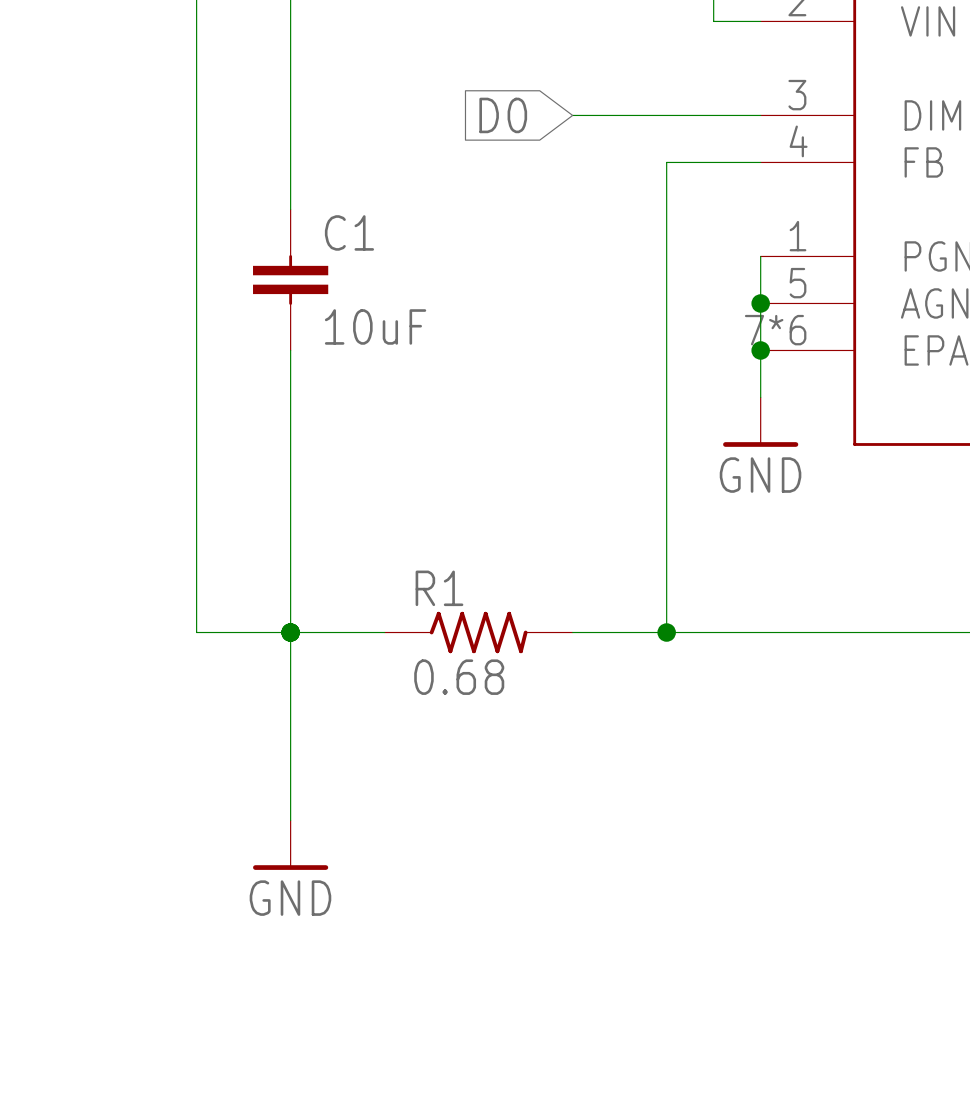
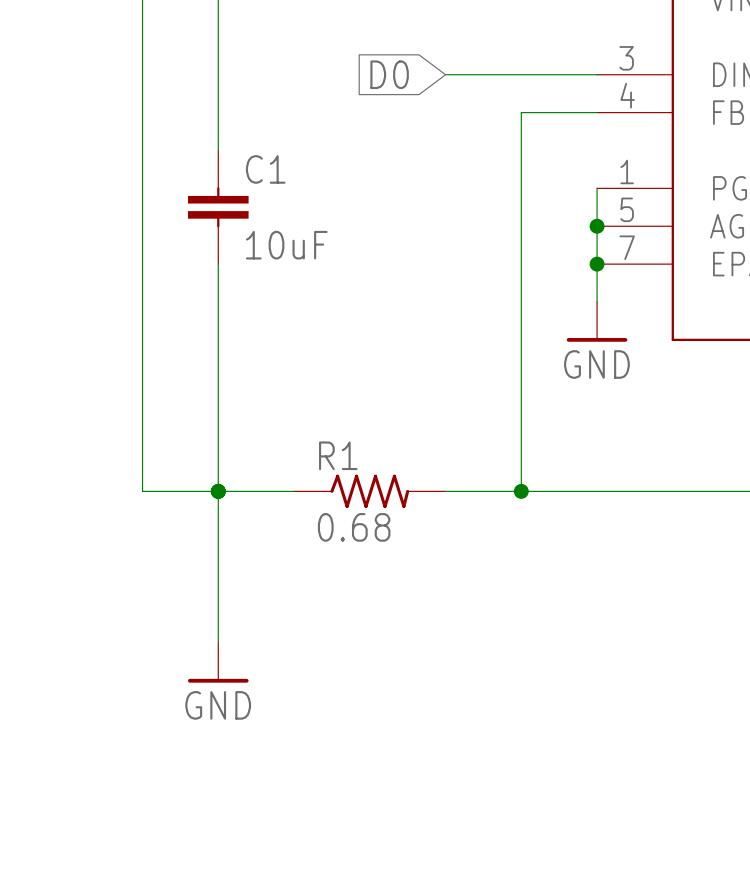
part pin number: 7*6 (775, 330) -> 7 (627, 247)

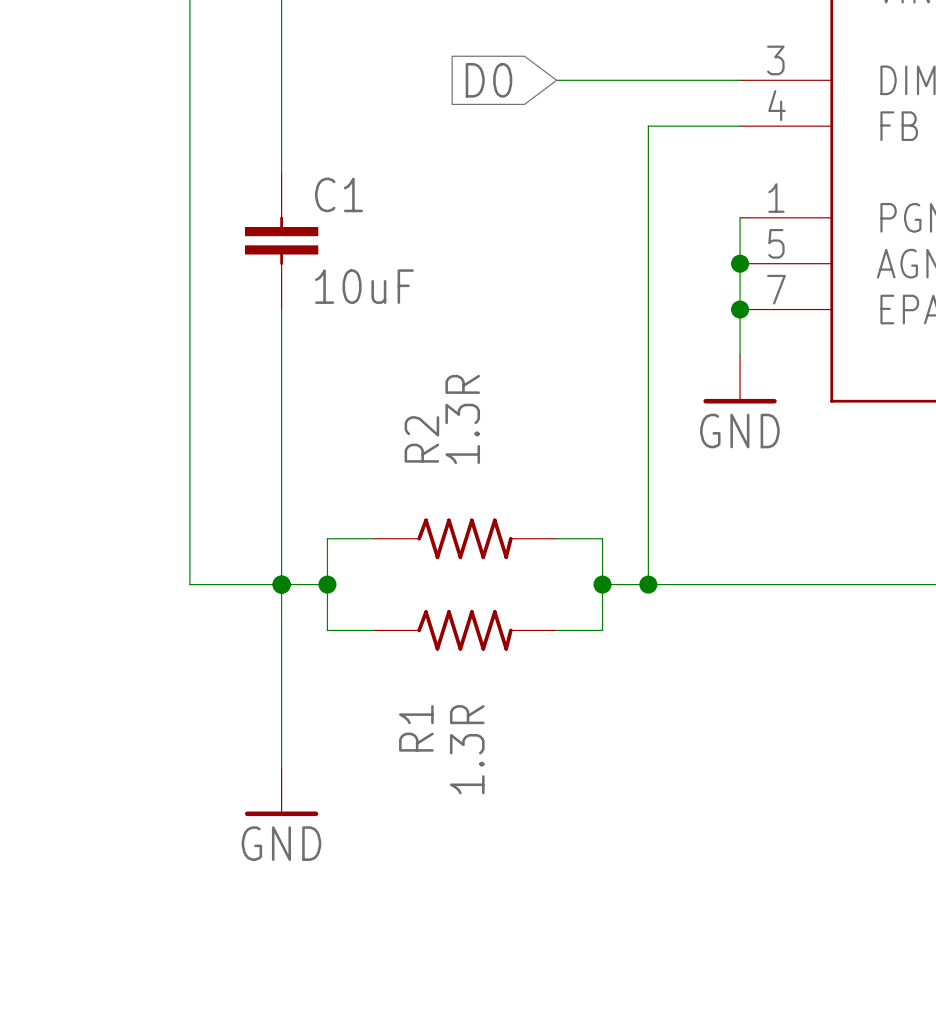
wire: none -> (373, 538) (327, 538) (327, 630) (373, 630)
R2: none -> 1.3R (464, 538)
wire: none -> (556, 538) (602, 538) (602, 630) (556, 630)
R1 name rotation: 0° (338, 455) -> 90° counterclockwise (416, 728)
R1 name position: R1 (338, 455) -> R1 (416, 728)
wire: (256, 491) (294, 491) -> none
junction: none -> (327, 584)
R1 position: (369, 491) -> (464, 630)
wire: (445, 491) (483, 491) -> none
junction: none -> (602, 584)
R1 value: 0.68 (354, 527) -> 1.3R (467, 749)

